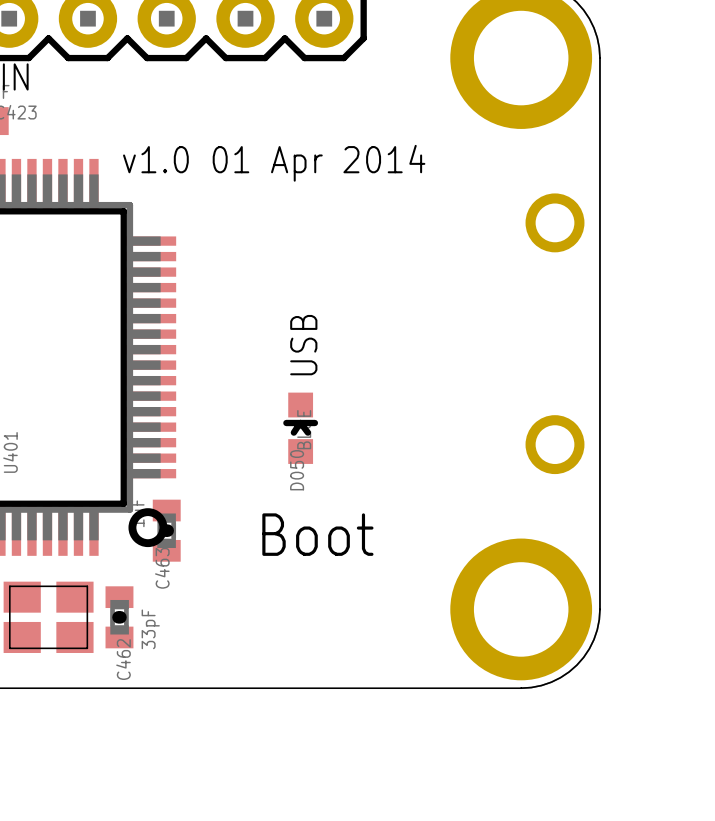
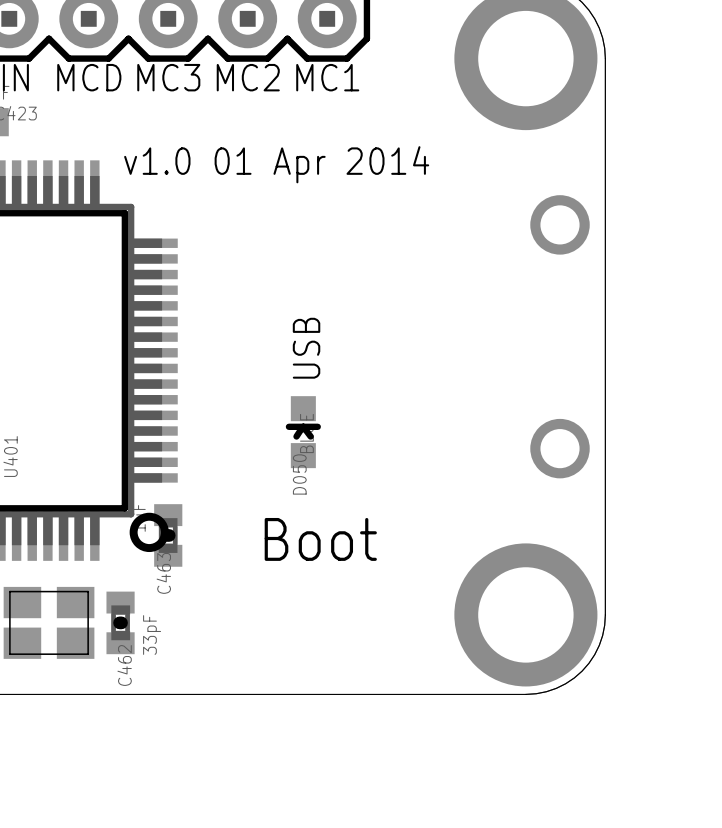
text: none -> MCD (89, 77)
text: none -> MC3 (168, 77)
text: none -> MC2 (248, 77)
text: none -> MC1 (327, 77)

